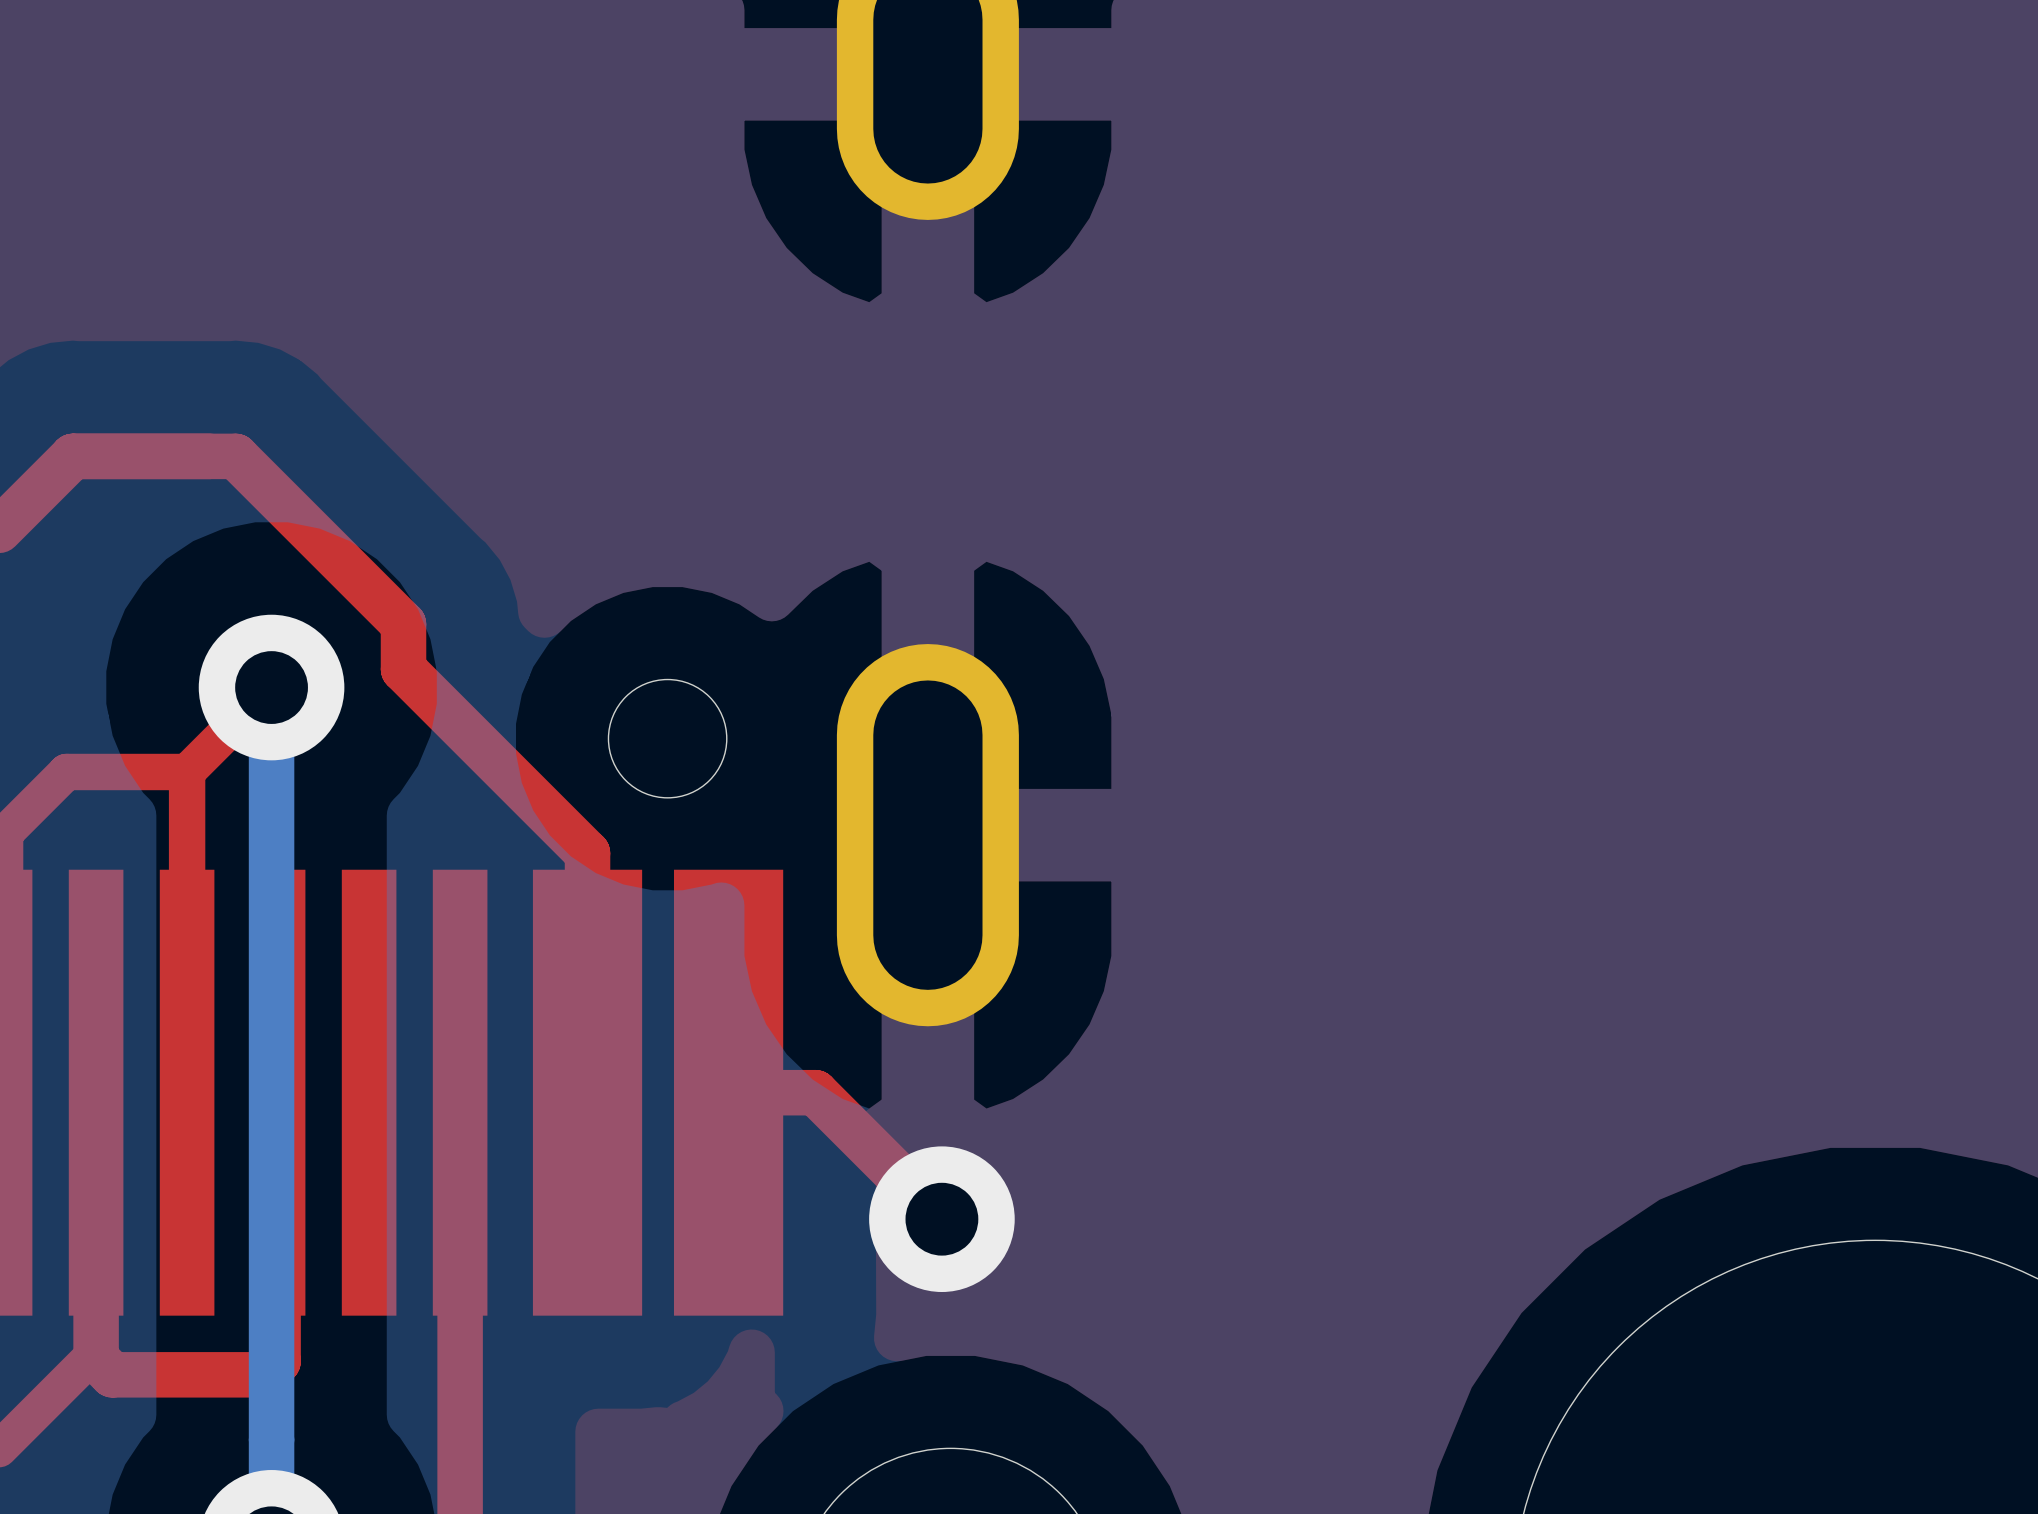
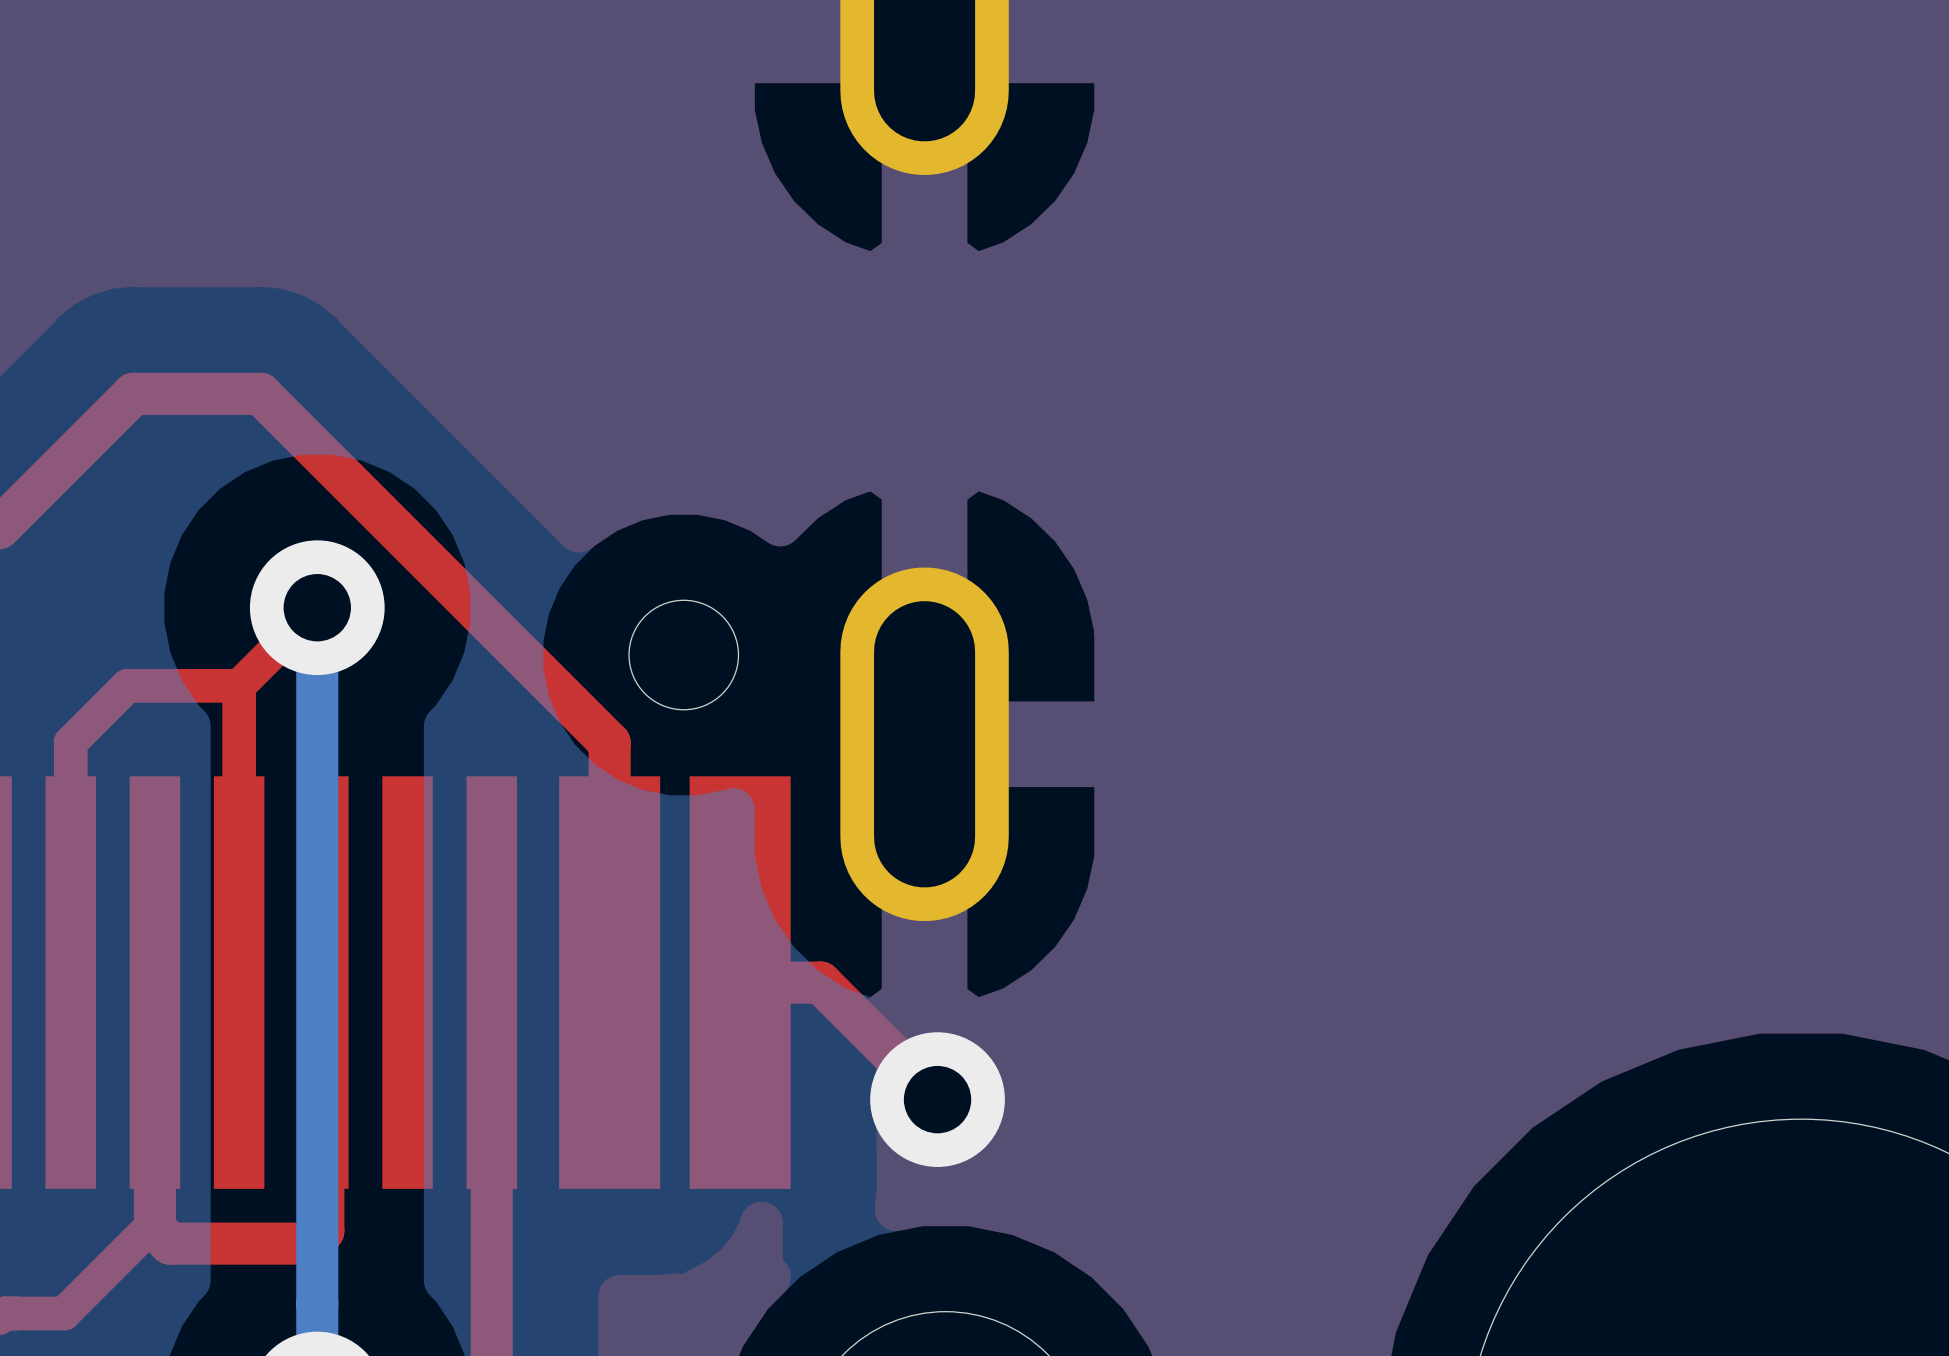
top track: (210, 456) (235, 456) (403, 624) (403, 669) (587, 853) -> (260, 393) (609, 742) (609, 761)

